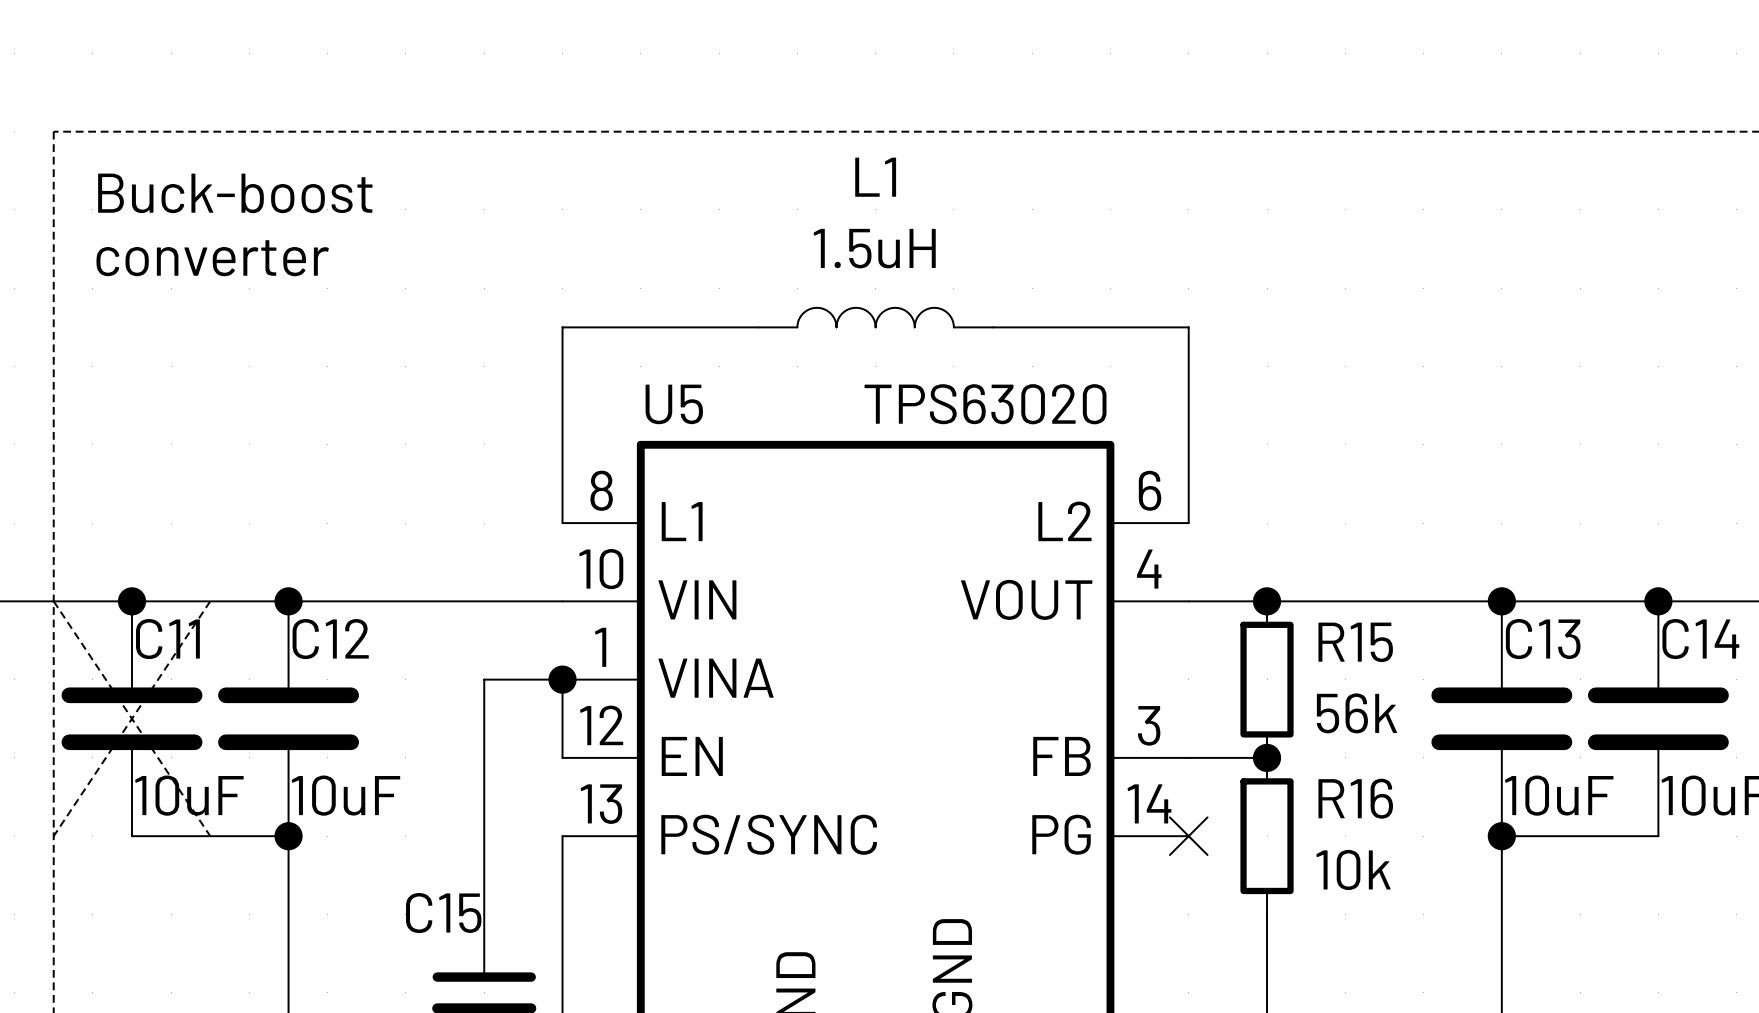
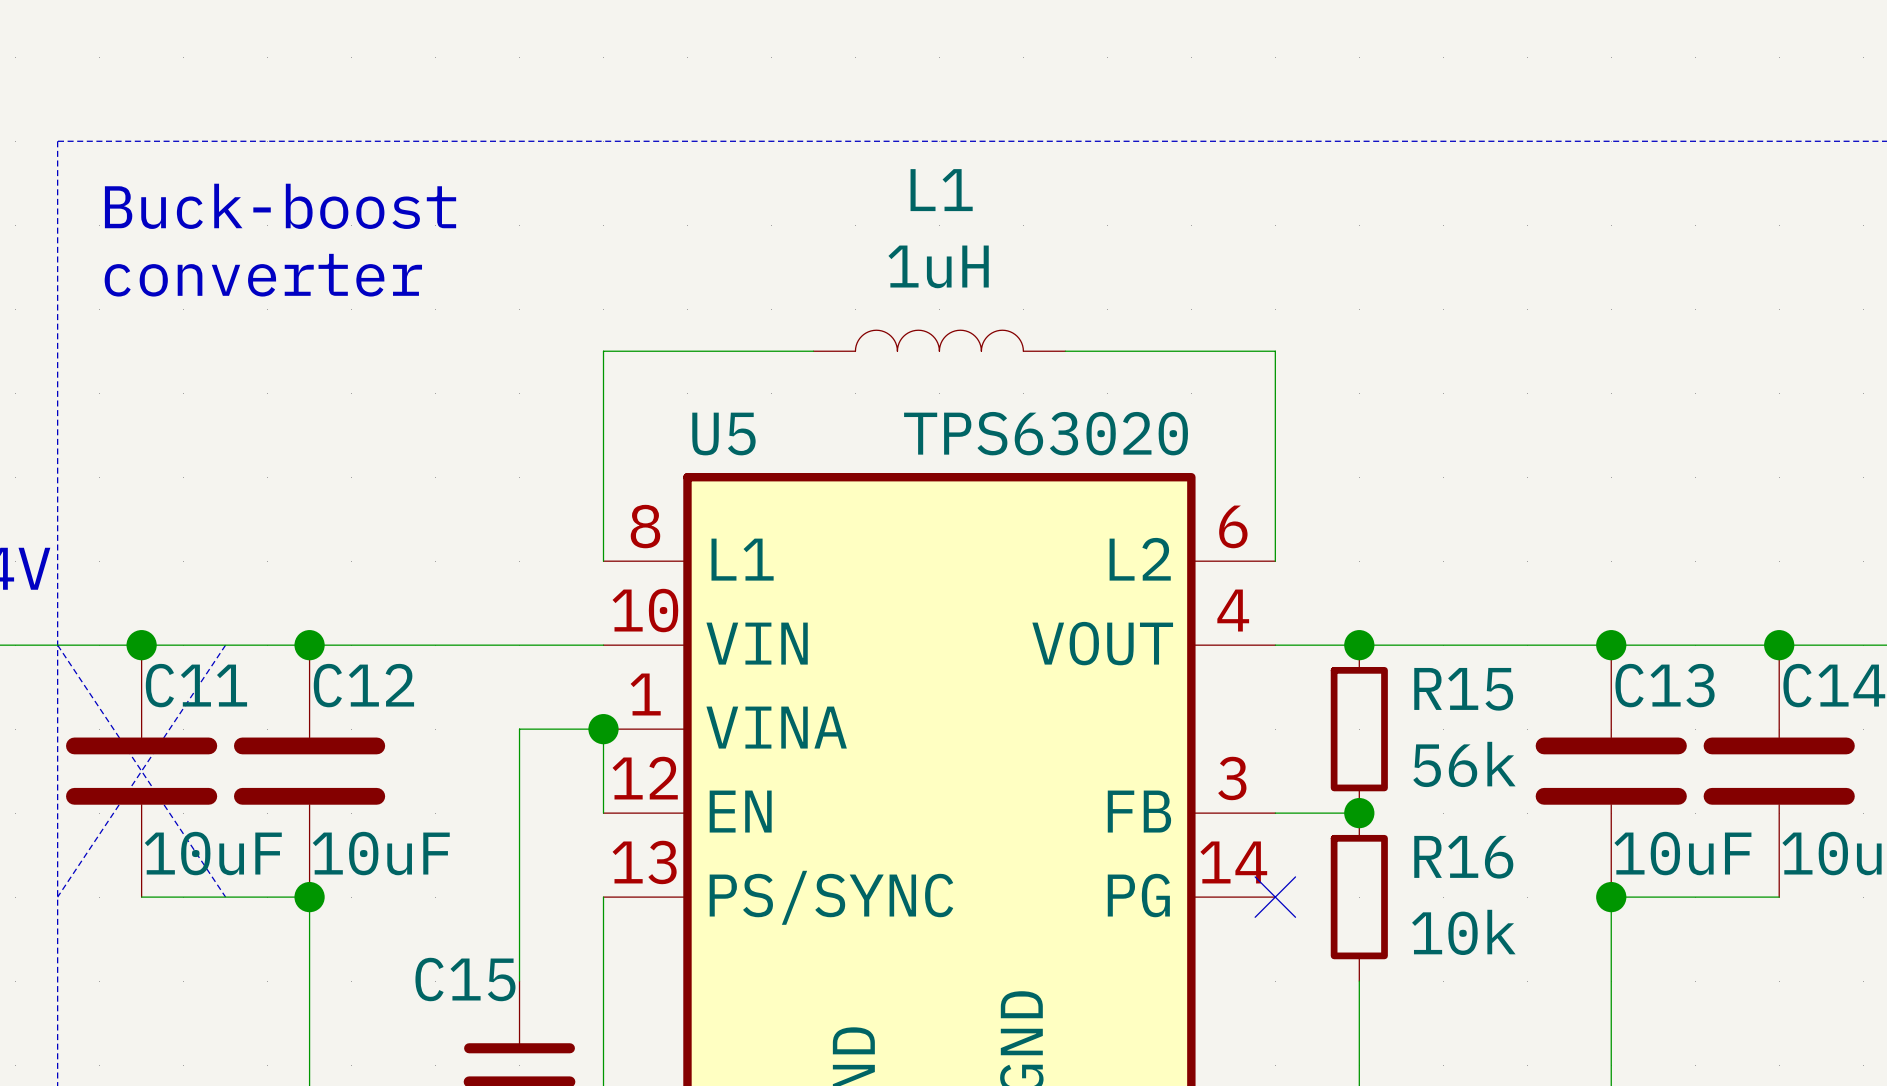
L1 value: 1.5uH (874, 248) -> 1uH (938, 266)

